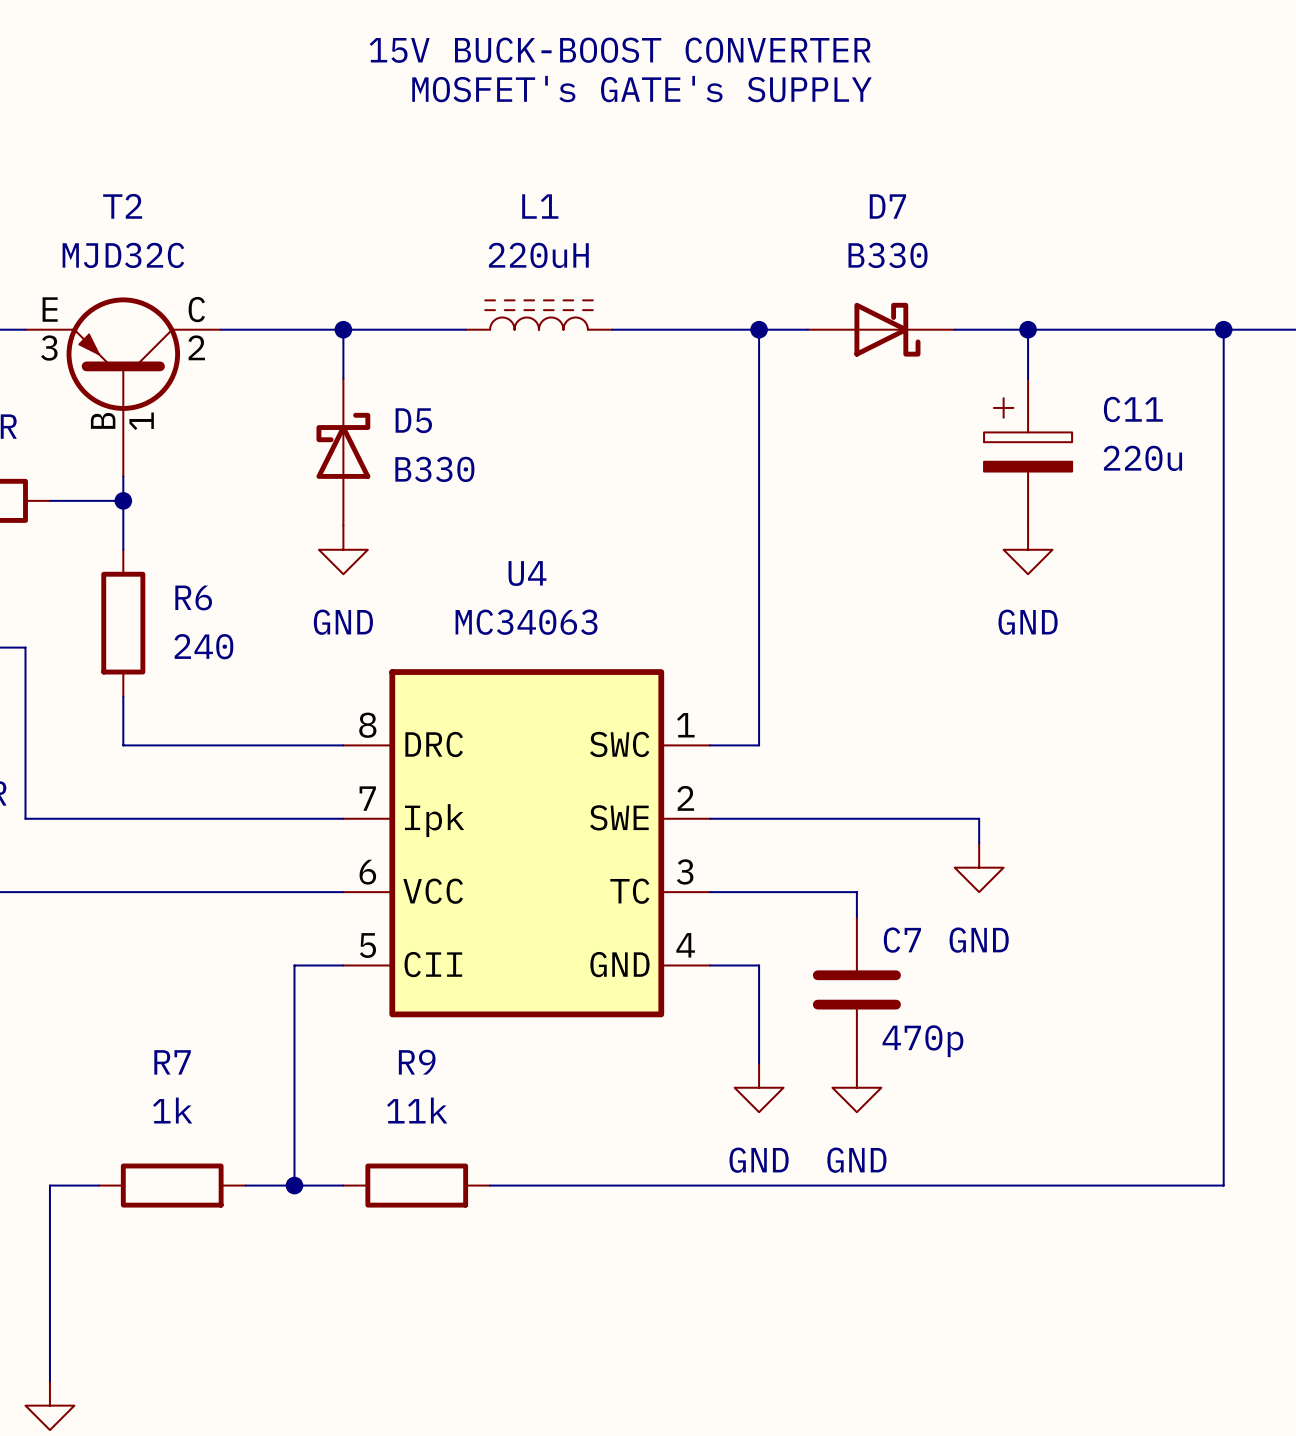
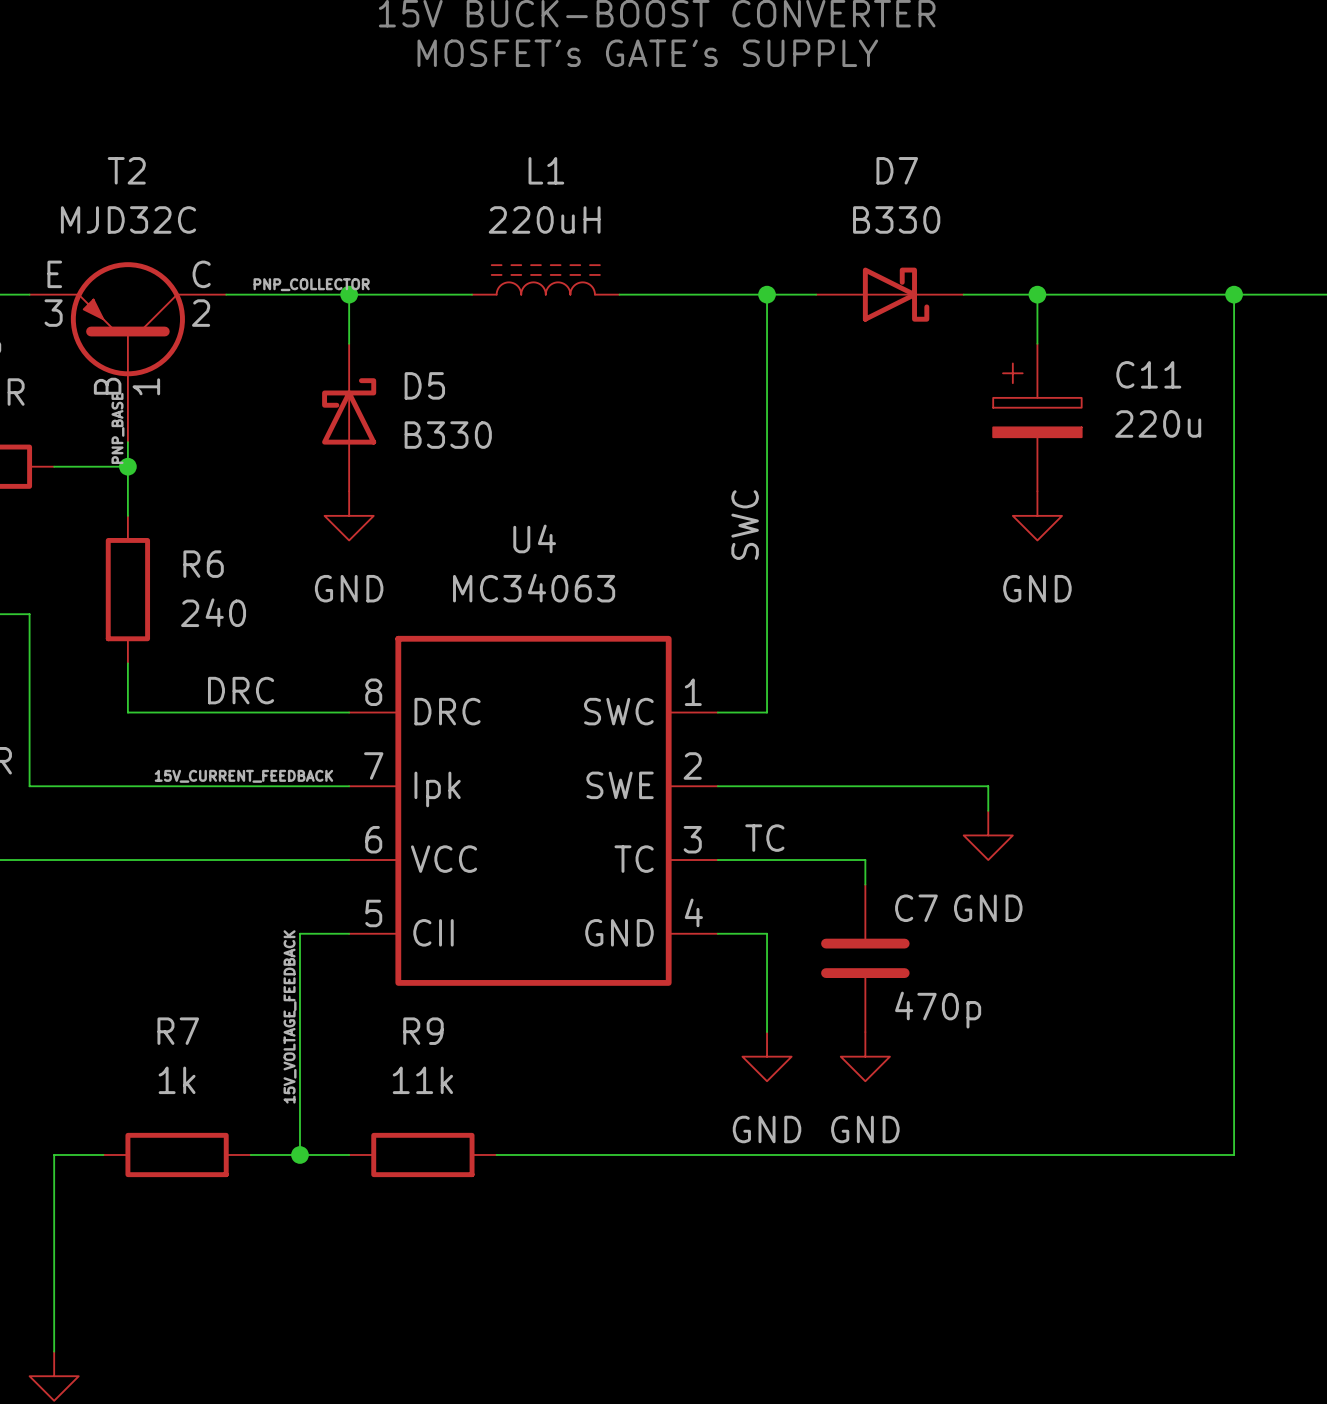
label: none -> PNP_COLLECTOR (311, 284)
label: none -> PNP_BASE (117, 428)
label: none -> SWC (745, 525)
label: none -> DRC (241, 690)
label: none -> 15V_CURRENT_FEEDBACK (243, 776)
label: none -> TC (764, 838)
label: none -> 15V_VOLTAGE_FEEDBACK (290, 1016)

